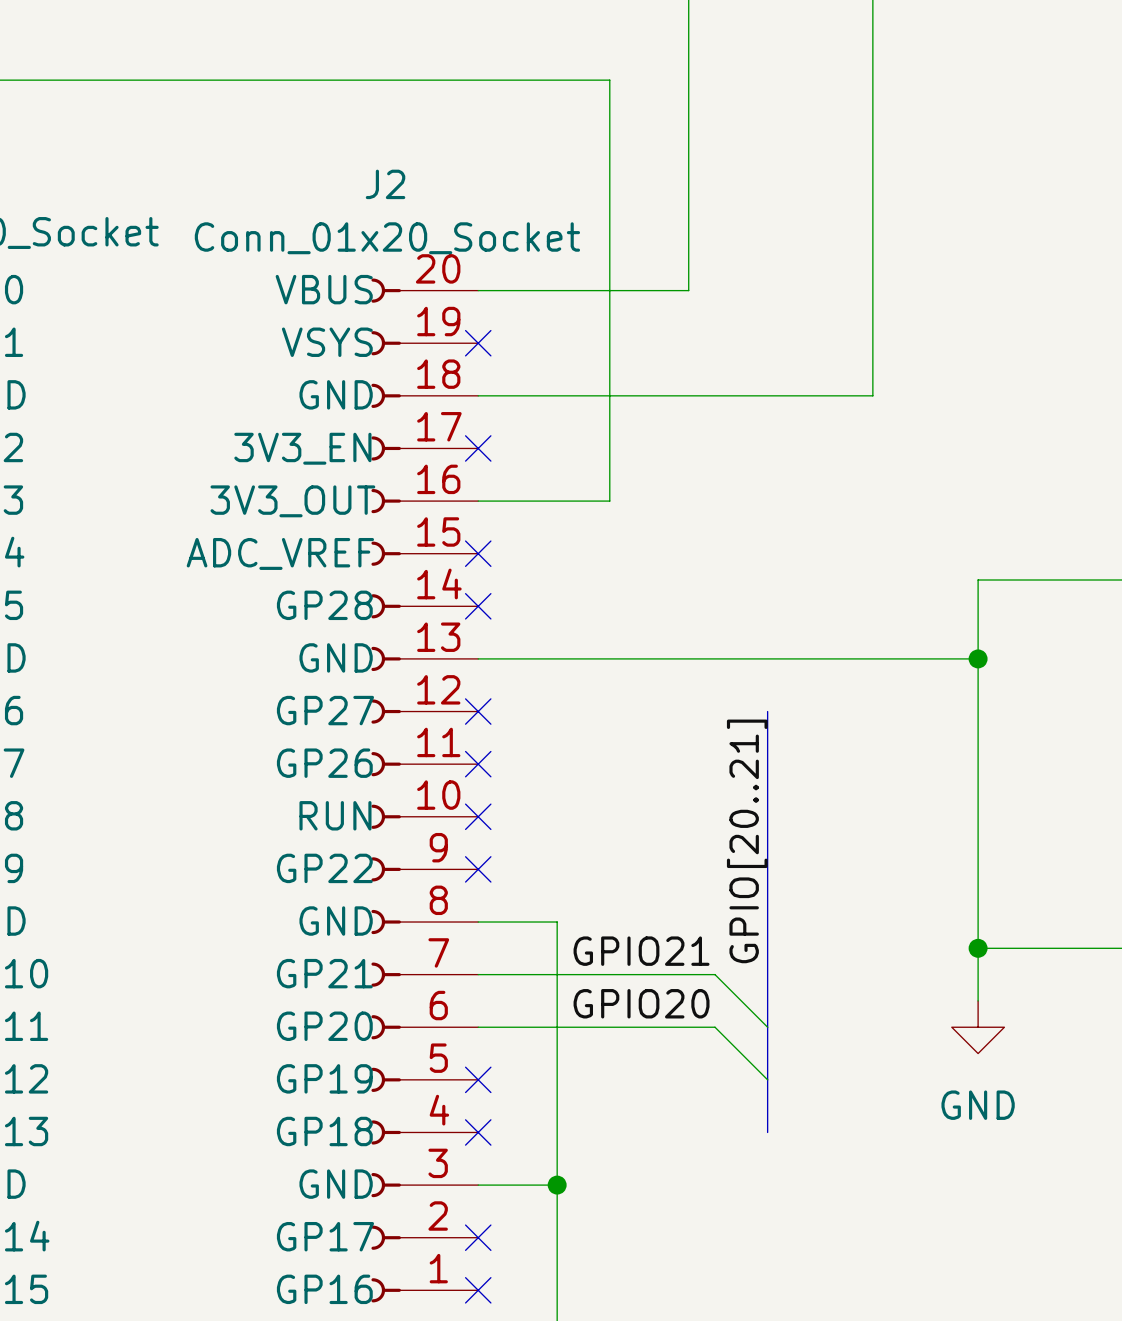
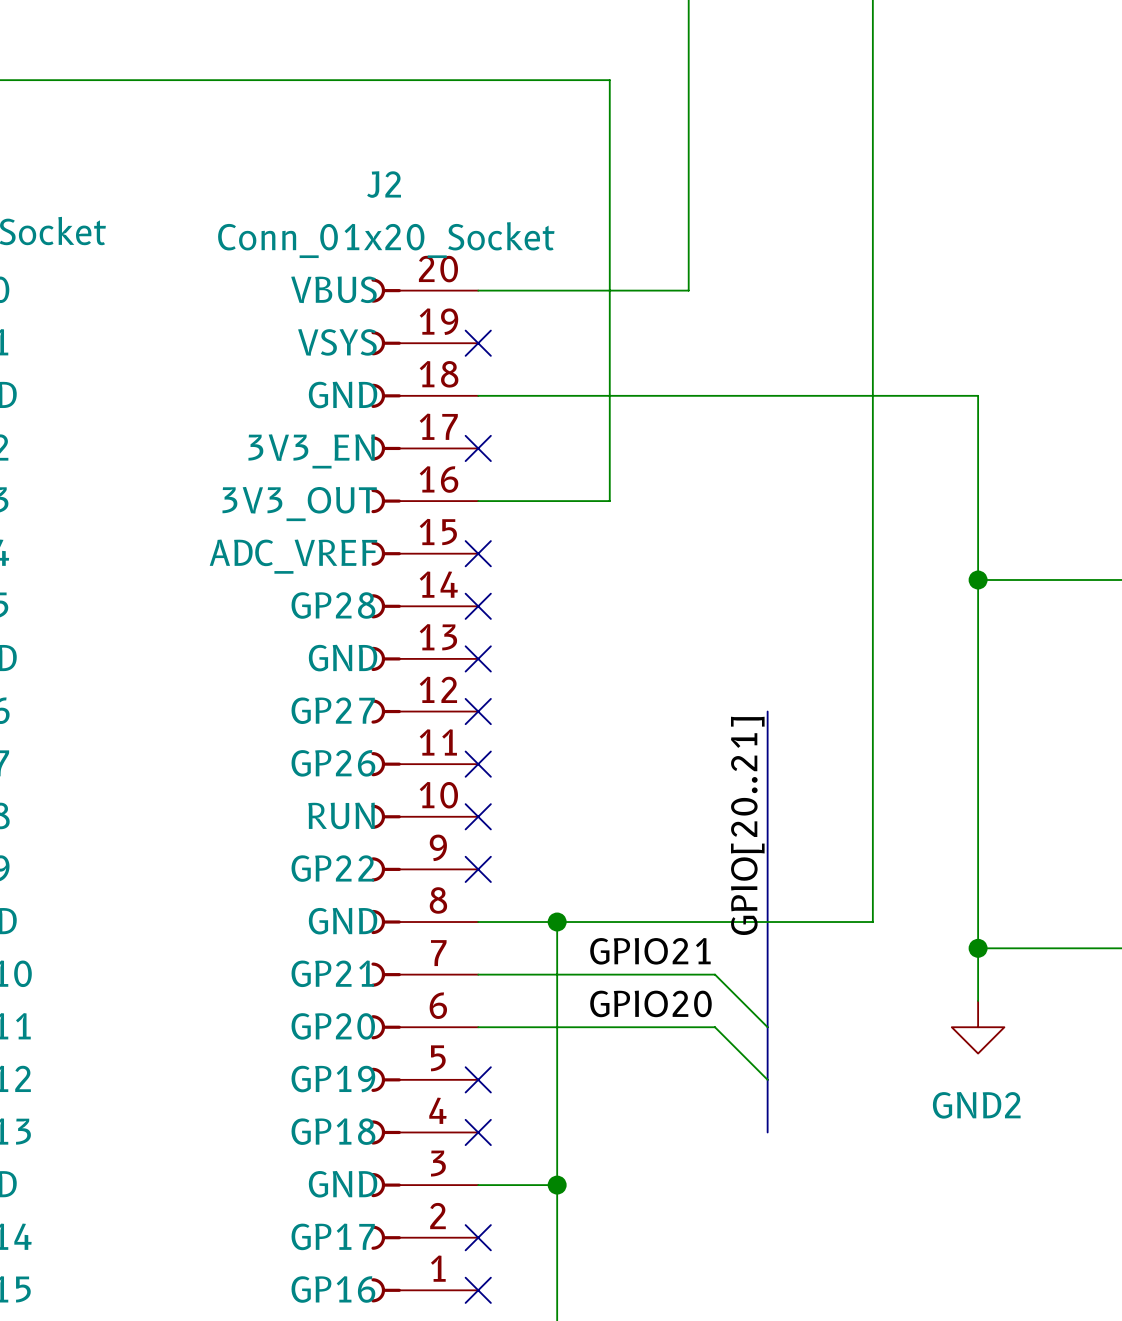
wire: none -> (978, 580) (978, 395) (872, 395) (872, 922) (557, 922)
wire: (478, 658) (978, 658) -> none
no-connect mark: none -> (478, 658)
junction position: (978, 658) -> (978, 580)
junction: none -> (557, 922)
power symbol: GND (978, 1027) -> GND2 (978, 1027)

